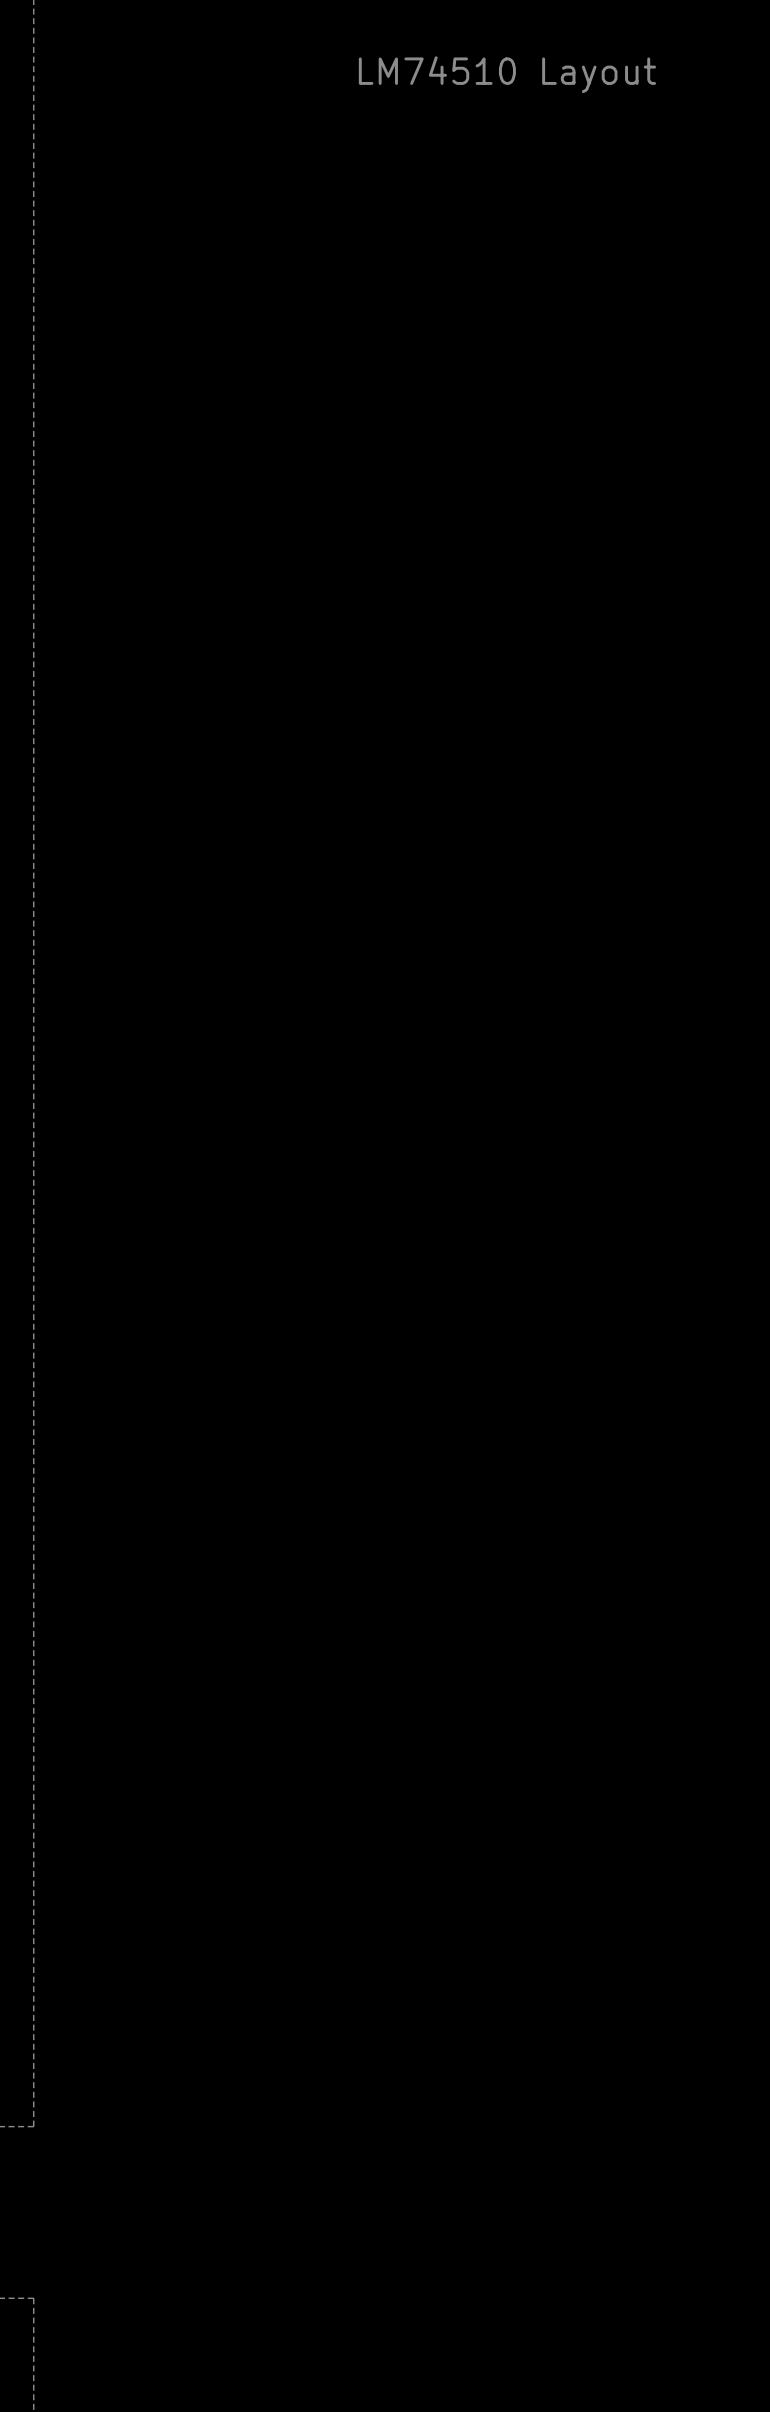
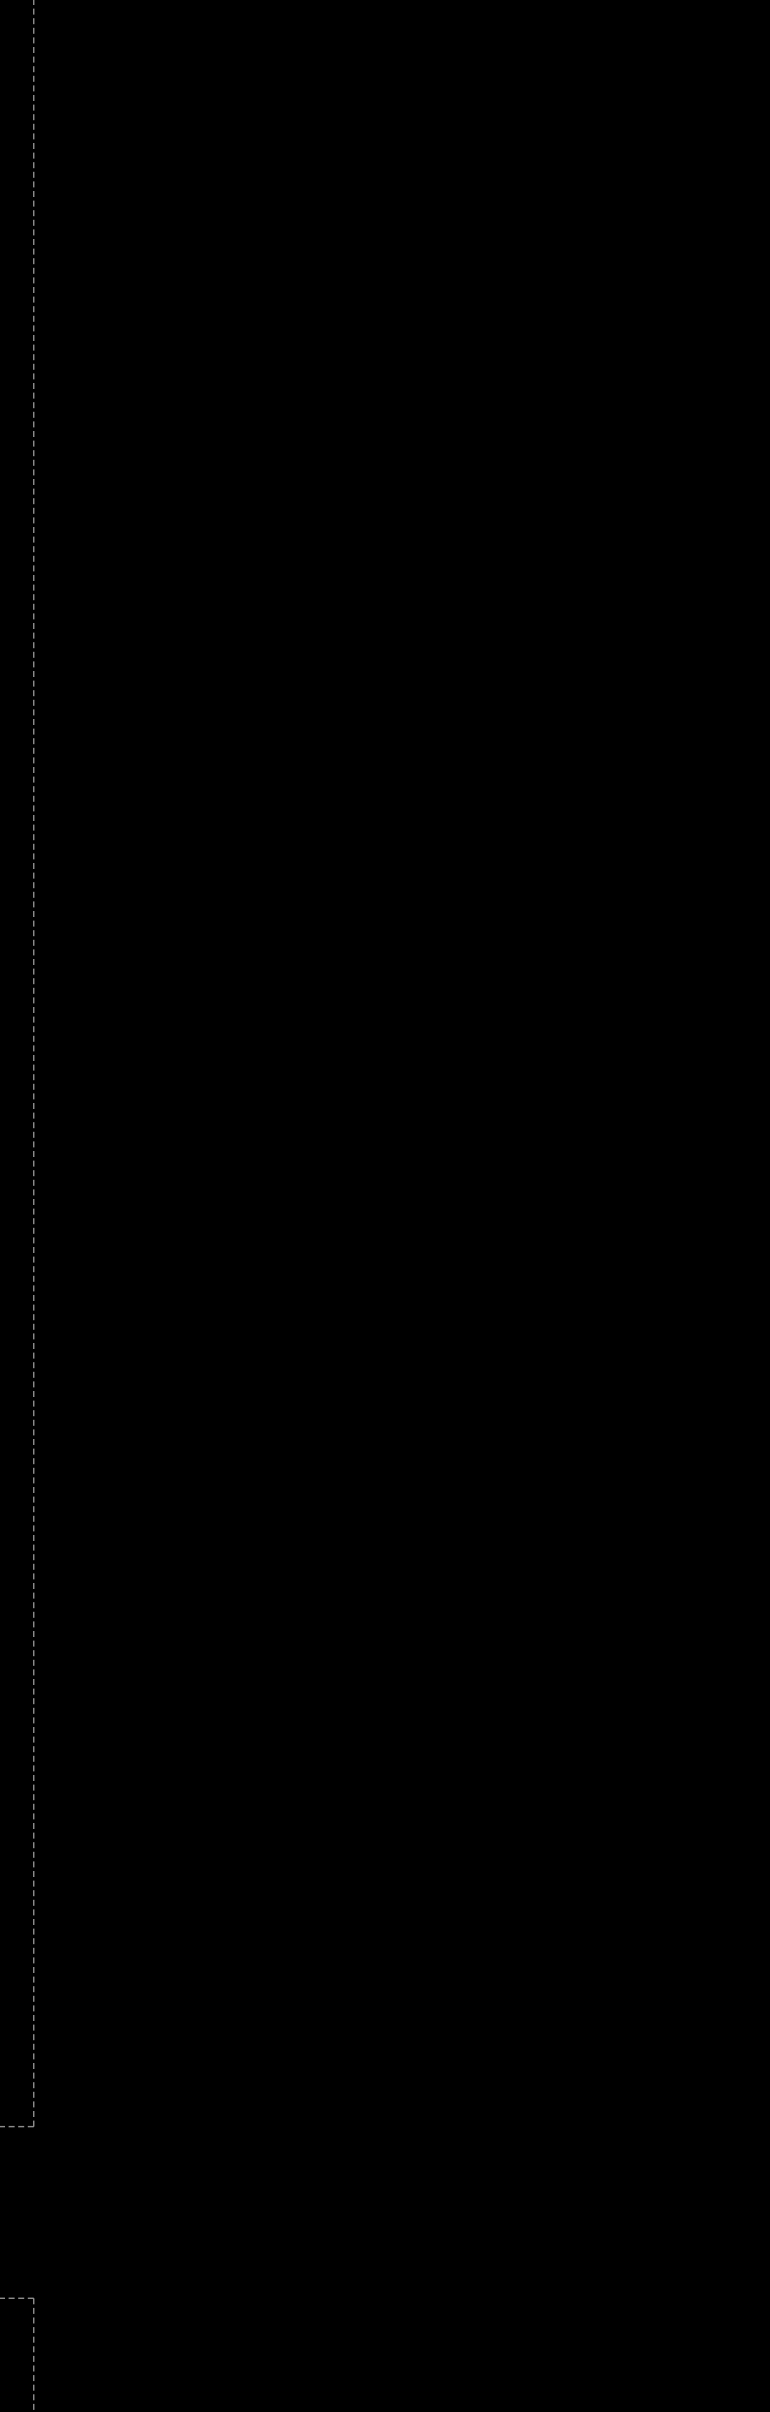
text: LM74510 Layout (507, 74) -> none

